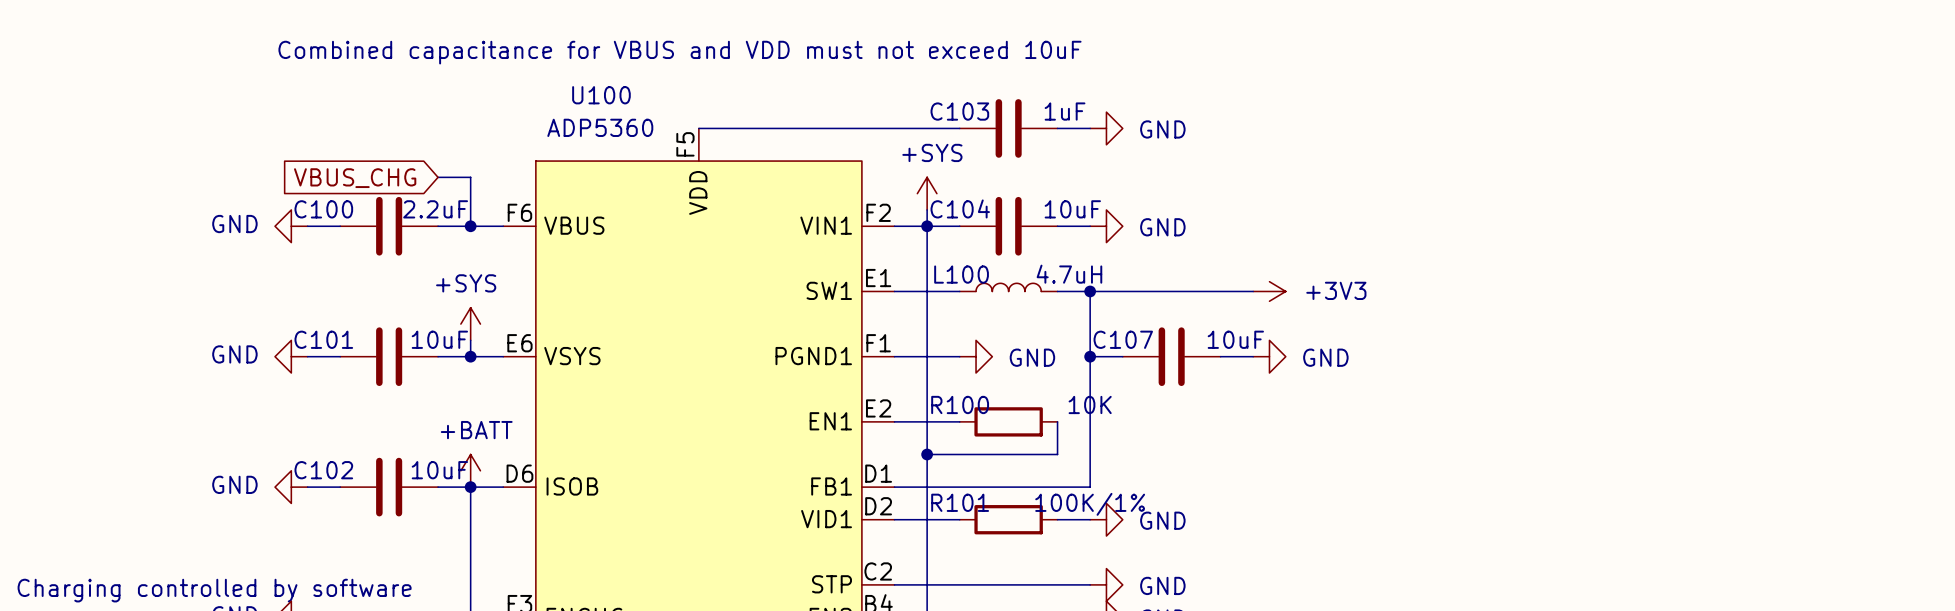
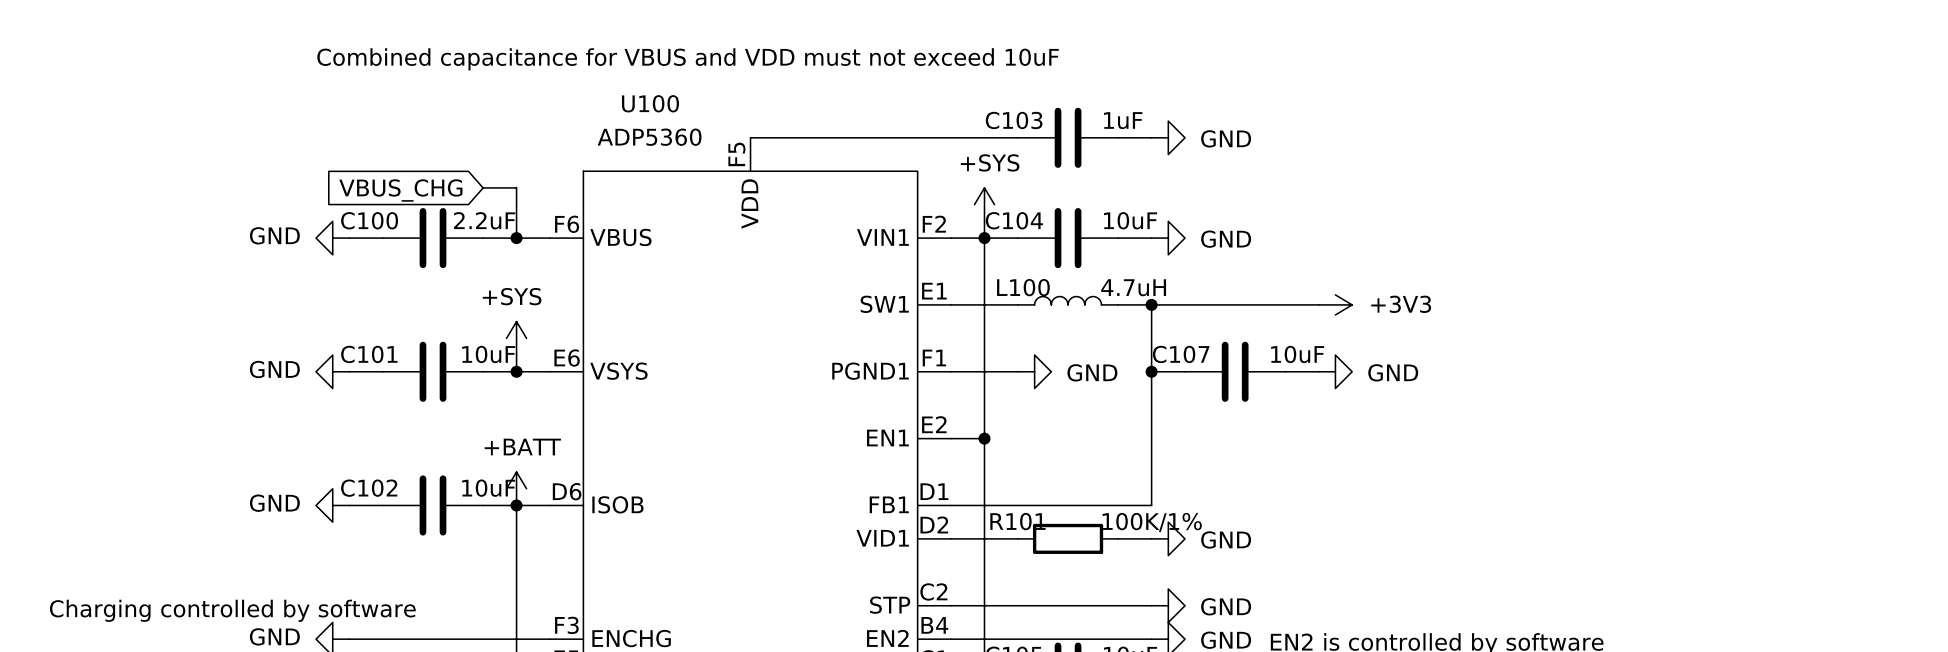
wire: (927, 421) (959, 421) -> none
R100: 10K (1008, 421) -> none
wire: (1057, 421) (1057, 454) (927, 454) -> none
junction position: (927, 454) -> (984, 438)

